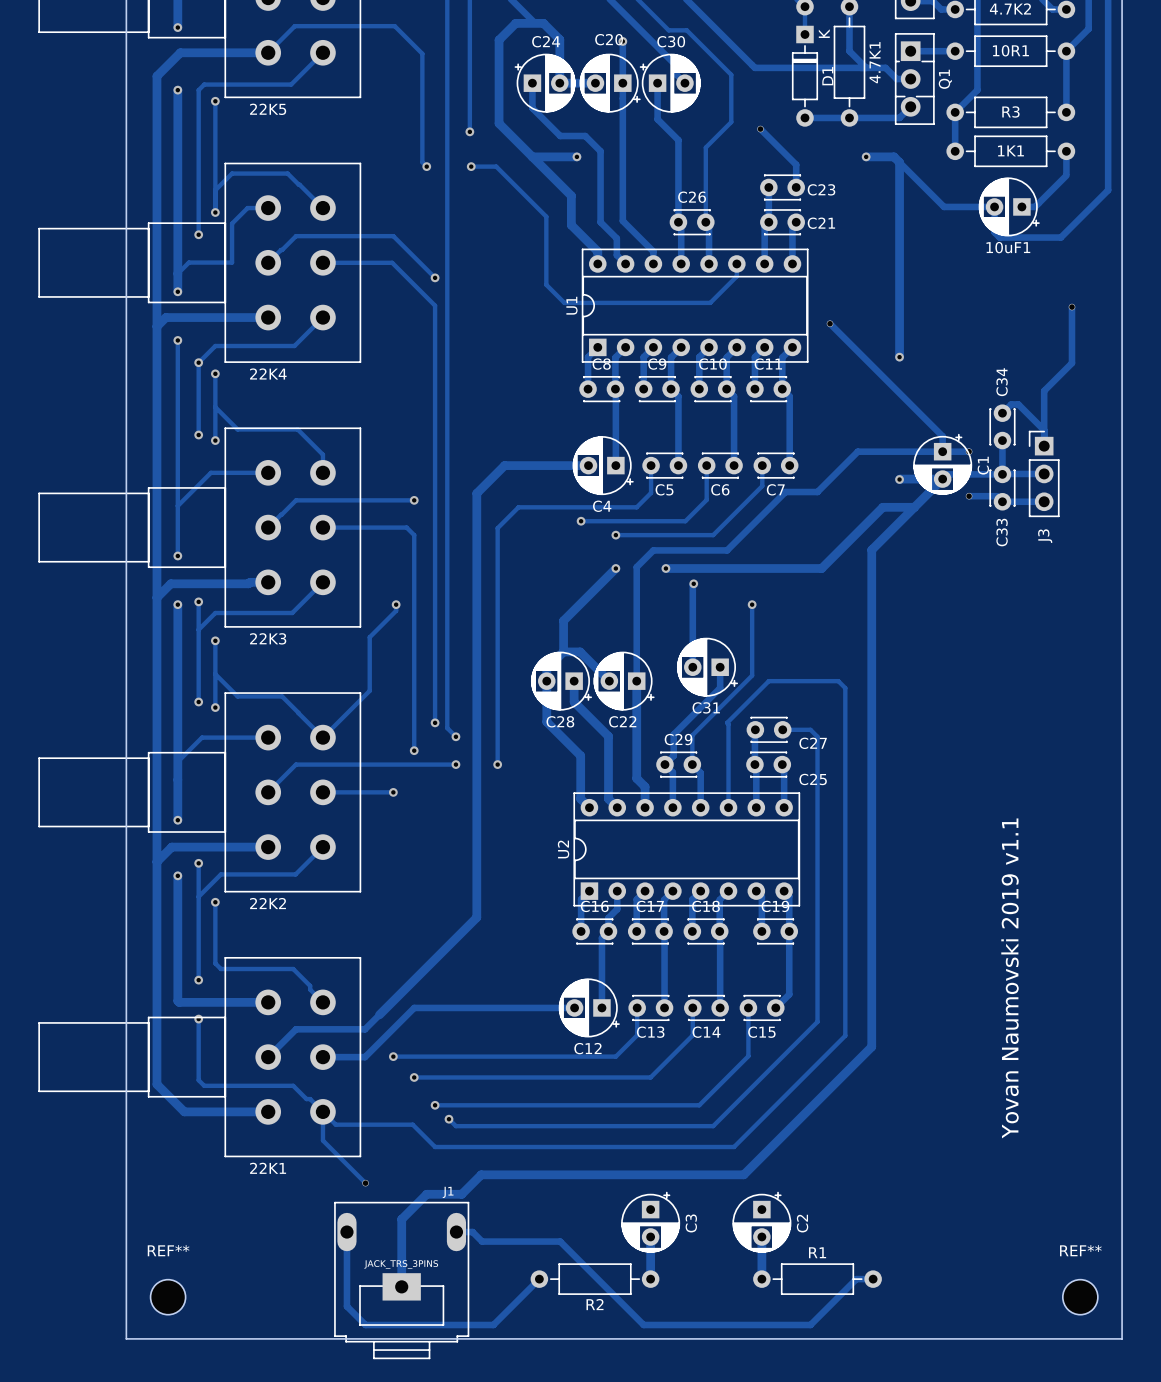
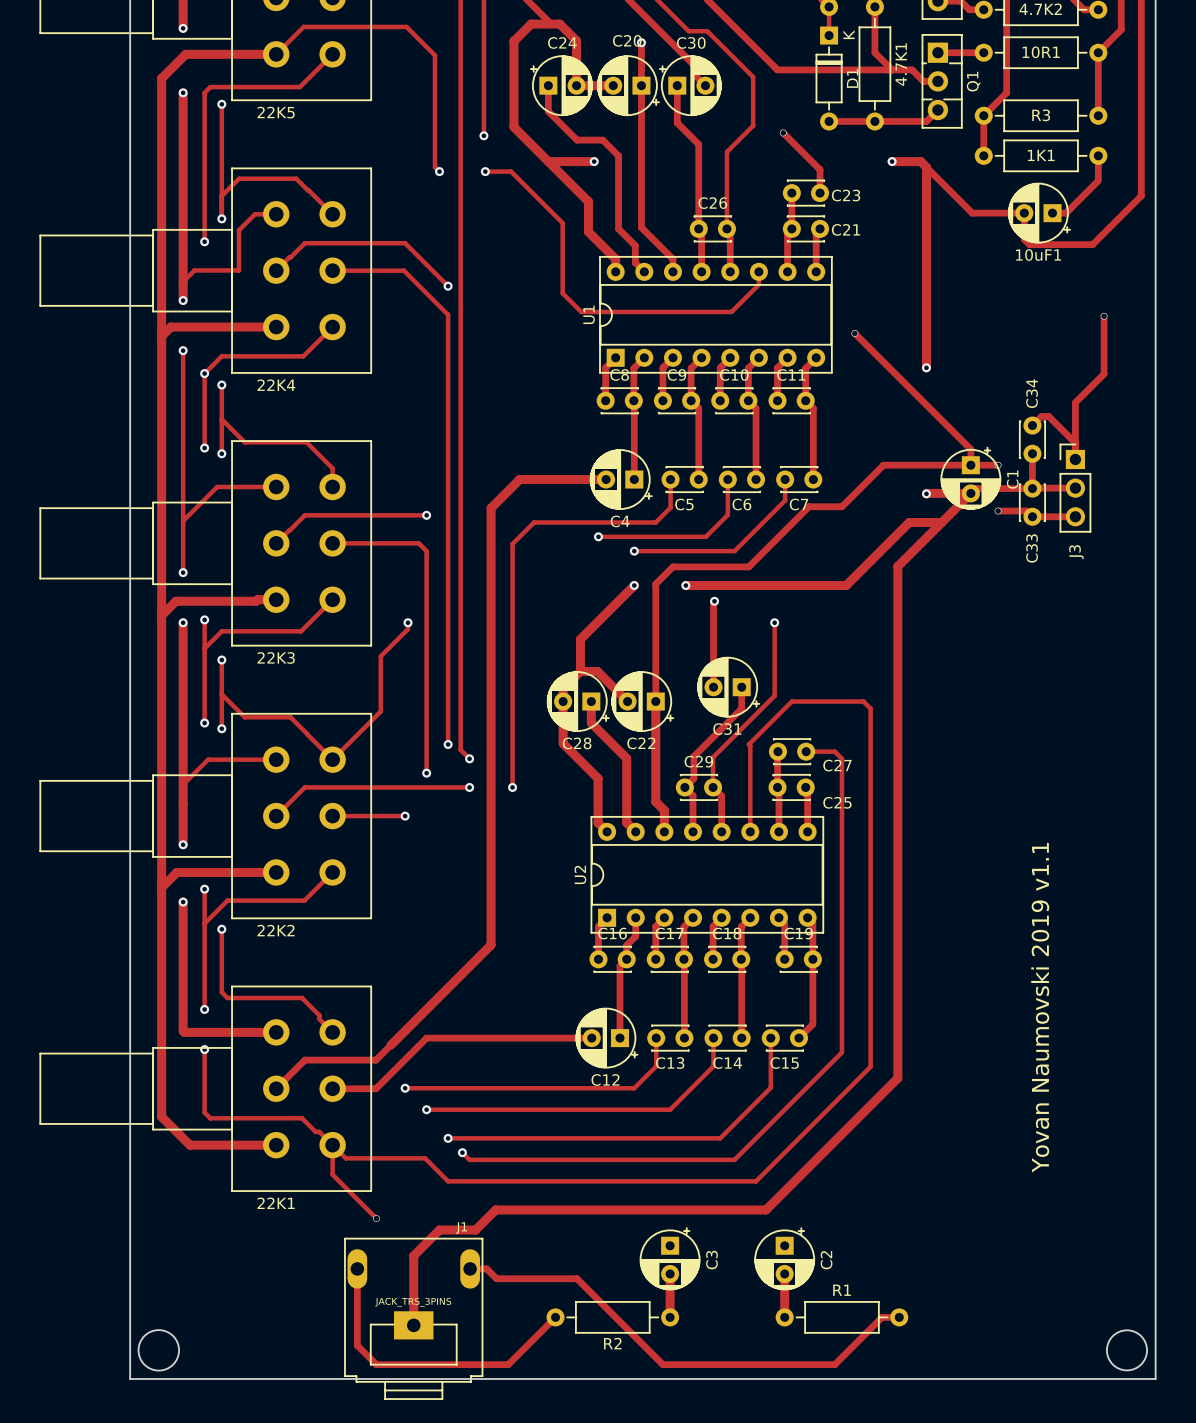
round board edge: none -> [137, 1329, 180, 1372]
round board edge: none -> [1106, 1329, 1148, 1372]
REF**: (168, 1297) -> none
REF**: (1080, 1297) -> none

